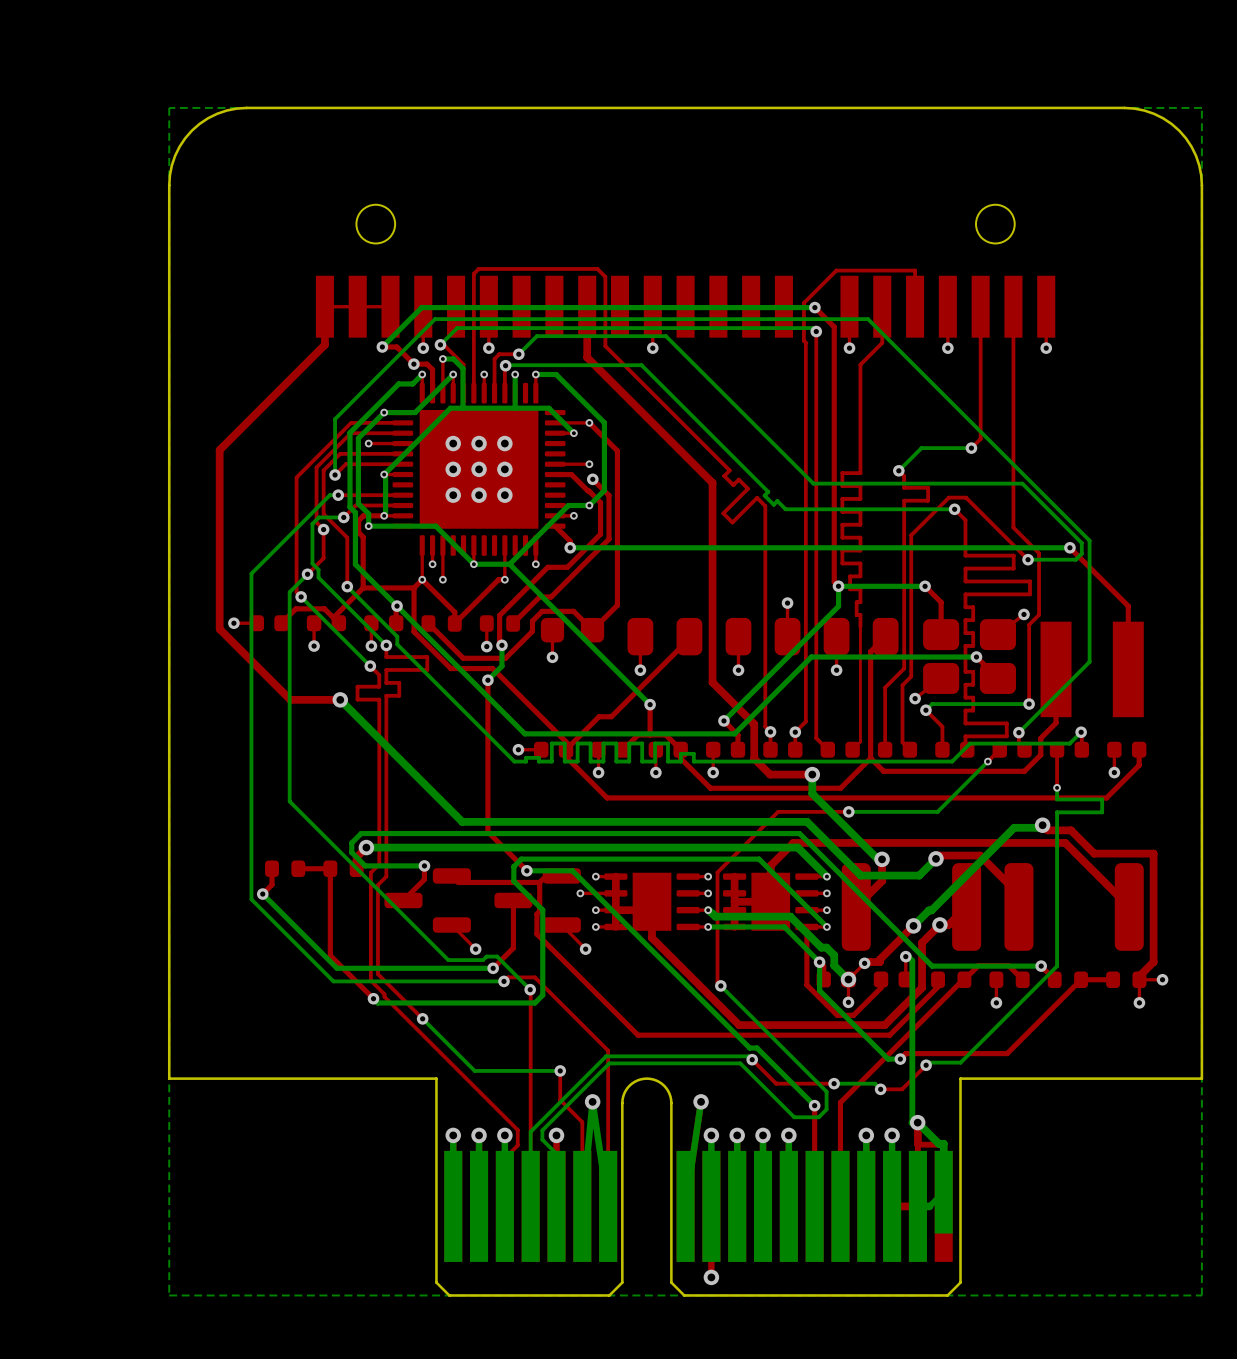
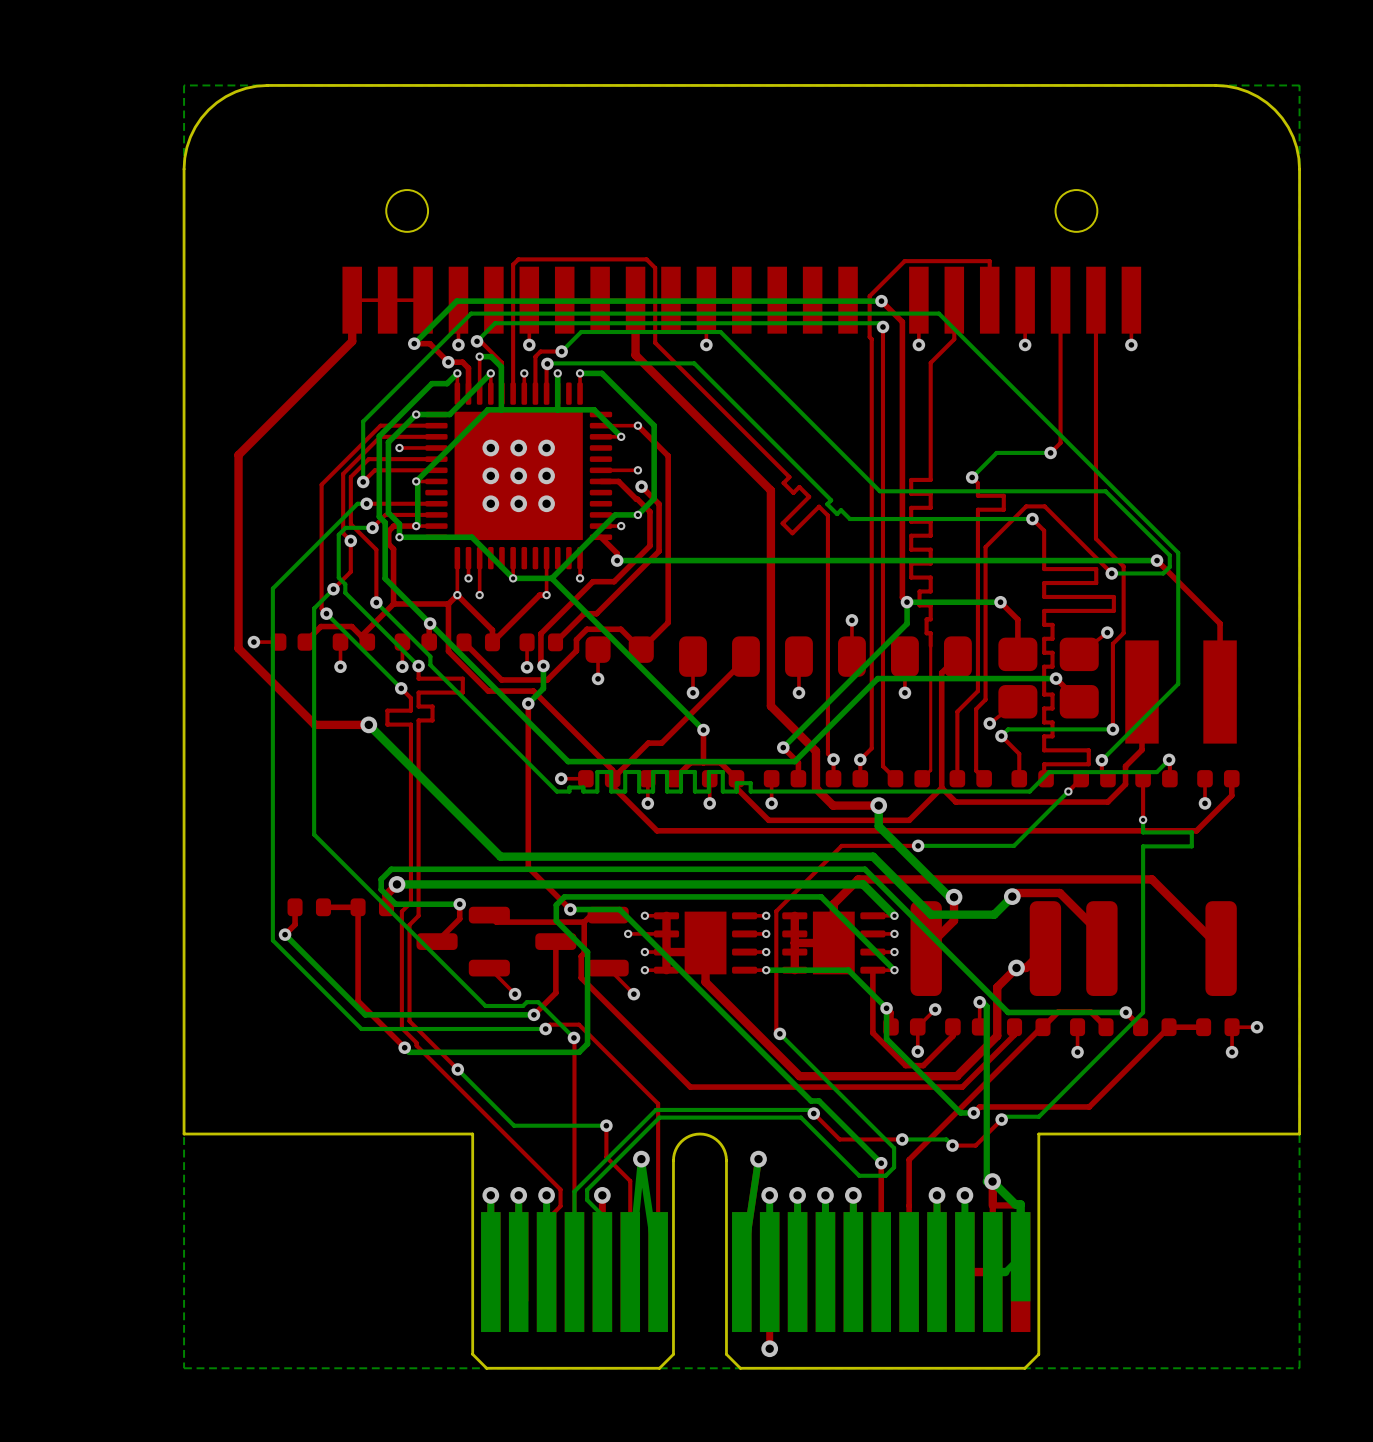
top track: (1042, 825) (1047, 830) (1071, 830) (1094, 853) (1153, 853) (1153, 962) (1140, 974) (1139, 979) -> none
bottom track: (1042, 825) (1040, 827) (1014, 827) (931, 910) (929, 910) (913, 925) -> none
via: (1042, 825) -> none
bottom track: (708, 910) (715, 916) (790, 916) (821, 947) (826, 947) (834, 955) (834, 965) (844, 976) -> none
top track: (913, 925) (879, 959) (879, 962) (864, 963) -> none
via: (913, 925) -> none
via: (848, 979) -> none

